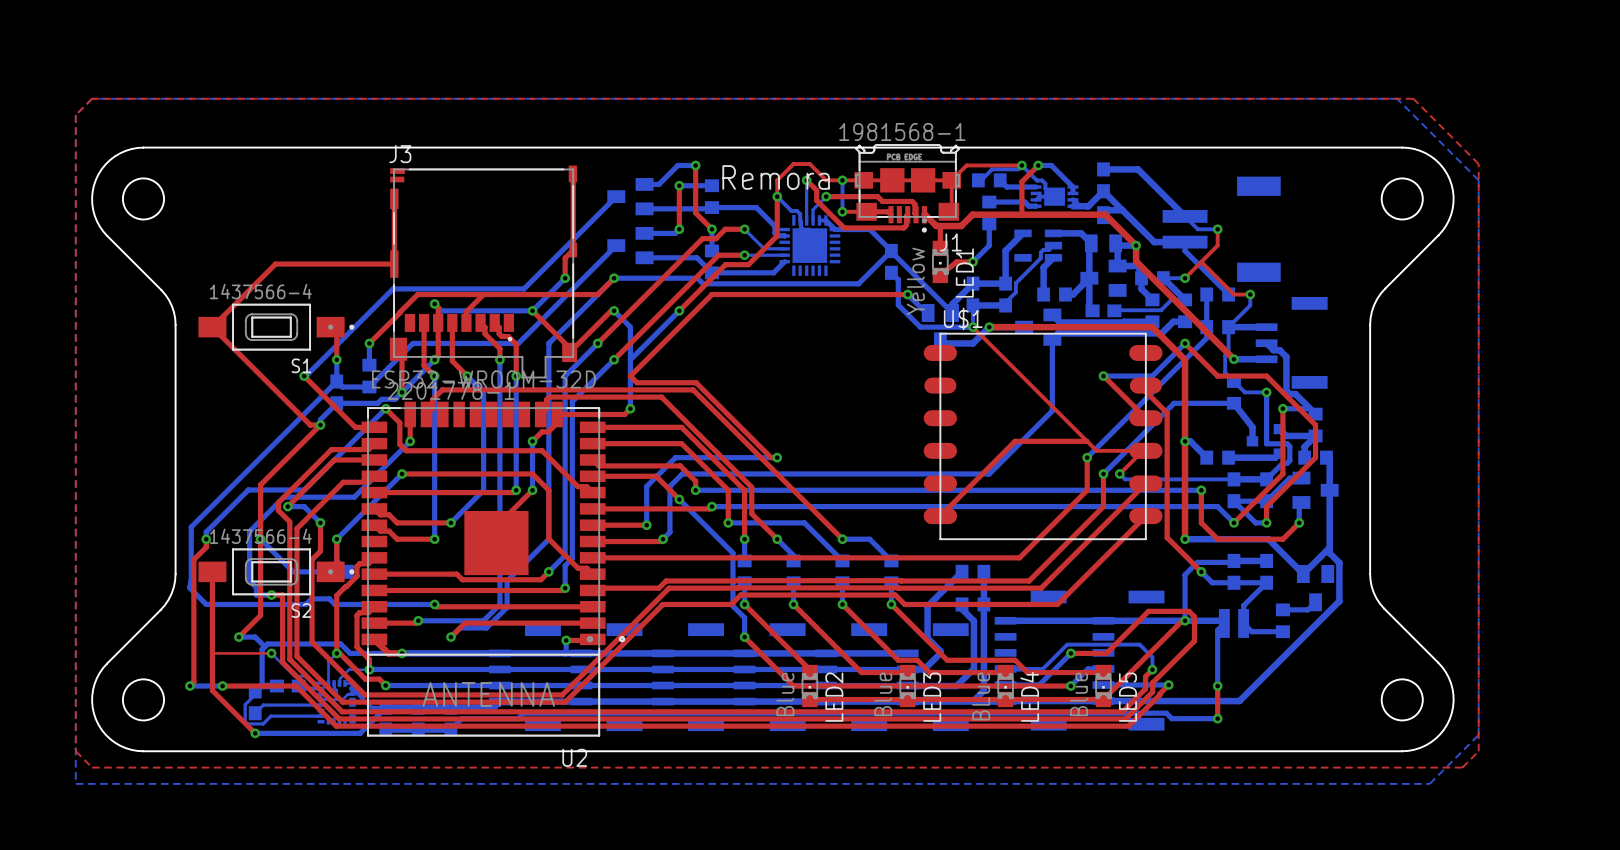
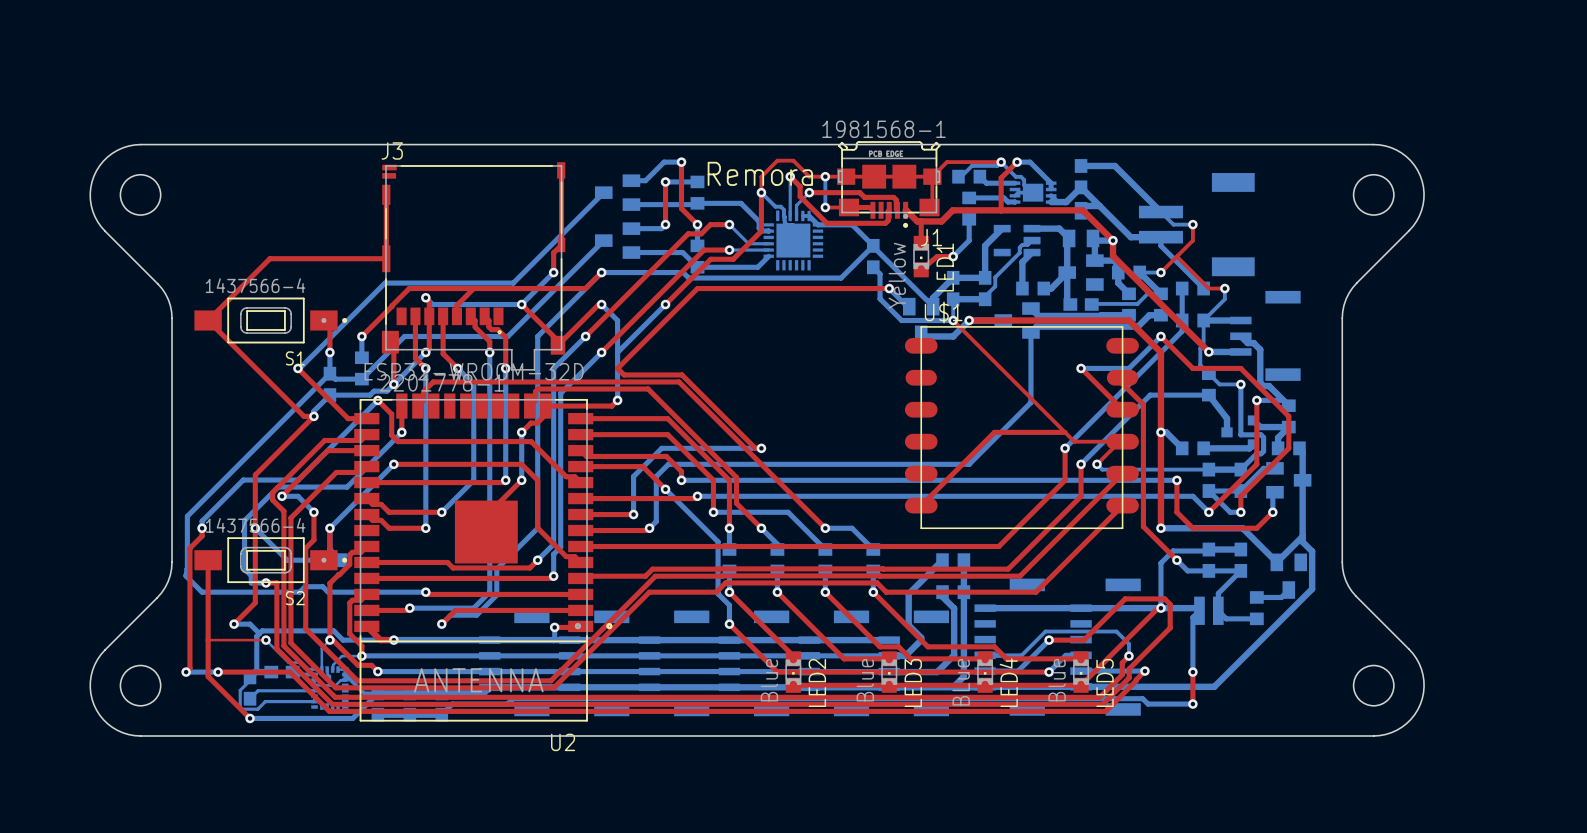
top zone outline: (92, 98) (1413, 98) (1478, 164) (1478, 751) (1462, 767) (92, 767) (75, 751) (75, 115) (92, 98) -> none
bottom zone outline: (92, 98) (1397, 98) (1478, 180) (1478, 734) (1429, 783) (75, 783) (75, 115) (92, 98) -> none

